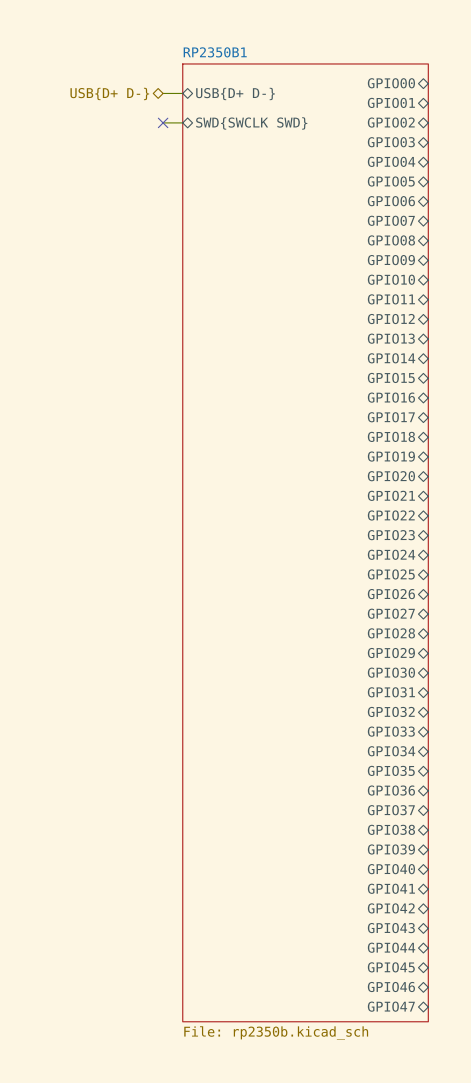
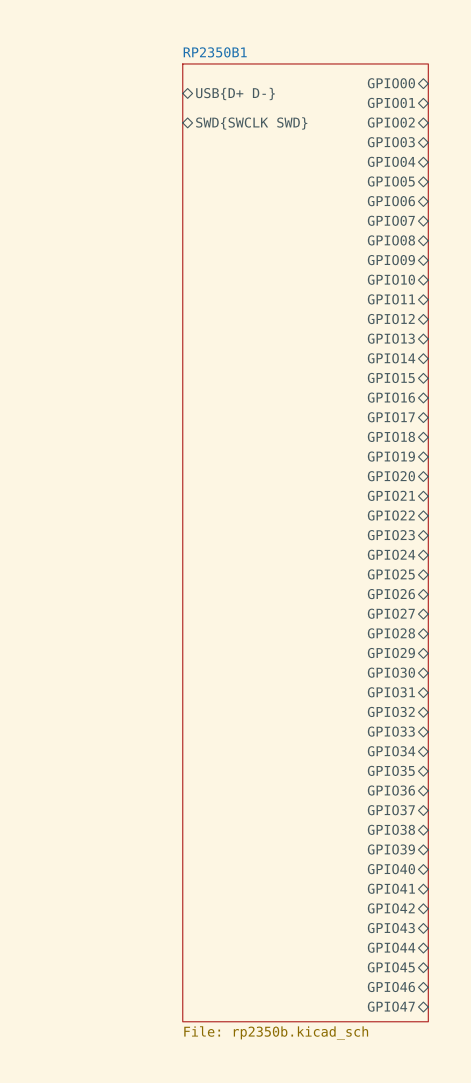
hierarchical label: USB{D+ D-} (109, 93) -> none
wire: (163, 93) (182, 93) -> none
wire: (163, 122) (182, 122) -> none
no-connect mark: (163, 122) -> none

